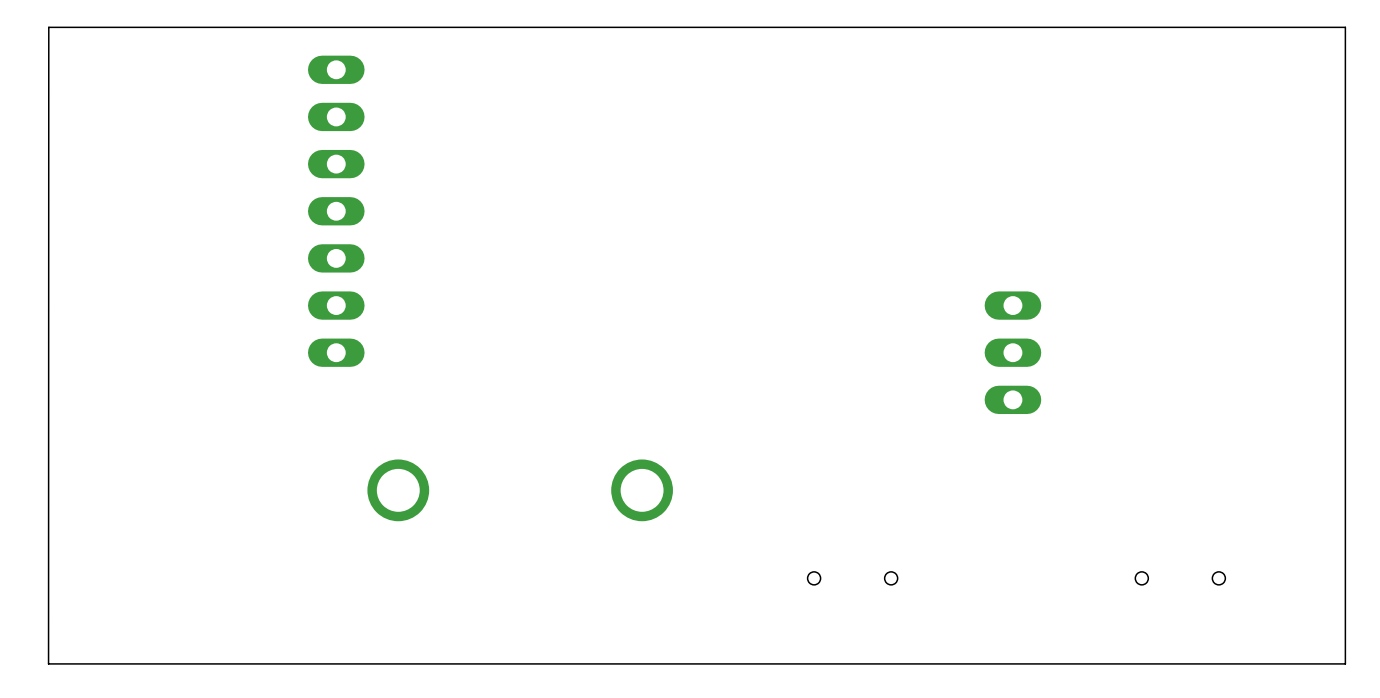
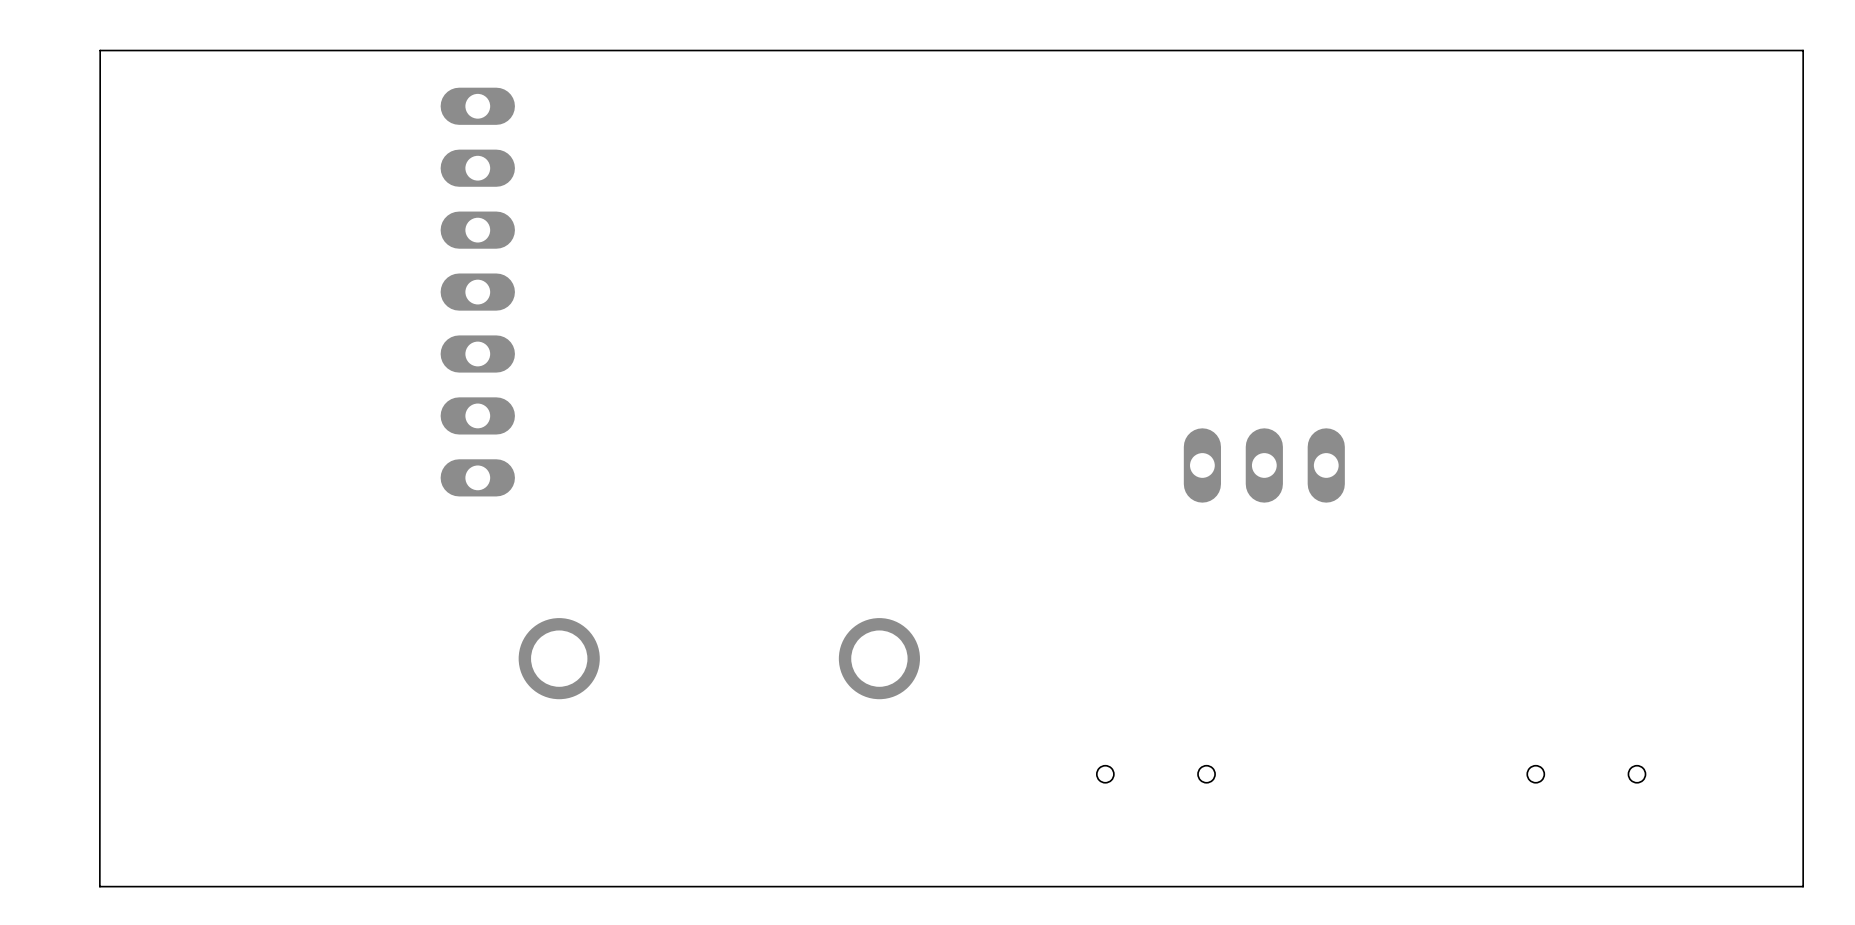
part rotation: 0° (1012, 352) -> 90° clockwise (1264, 465)
part position: (1012, 352) -> (1264, 465)

